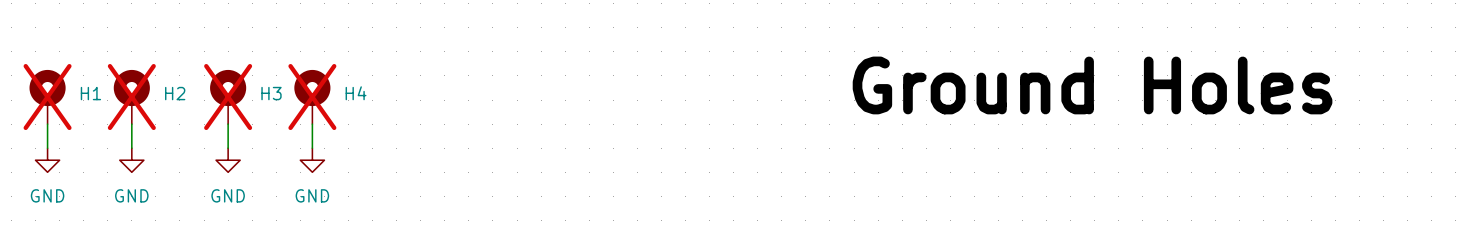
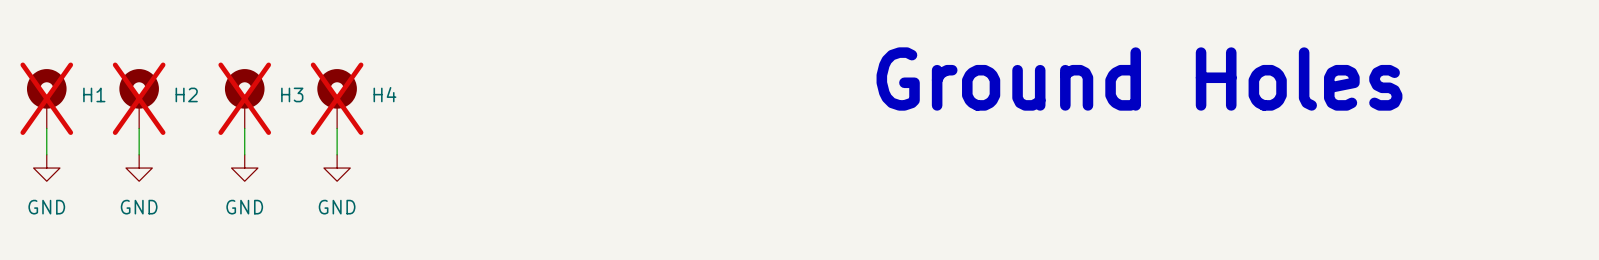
text: none -> Ground Holes (1139, 79)
label: Ground Holes (1092, 85) -> none

